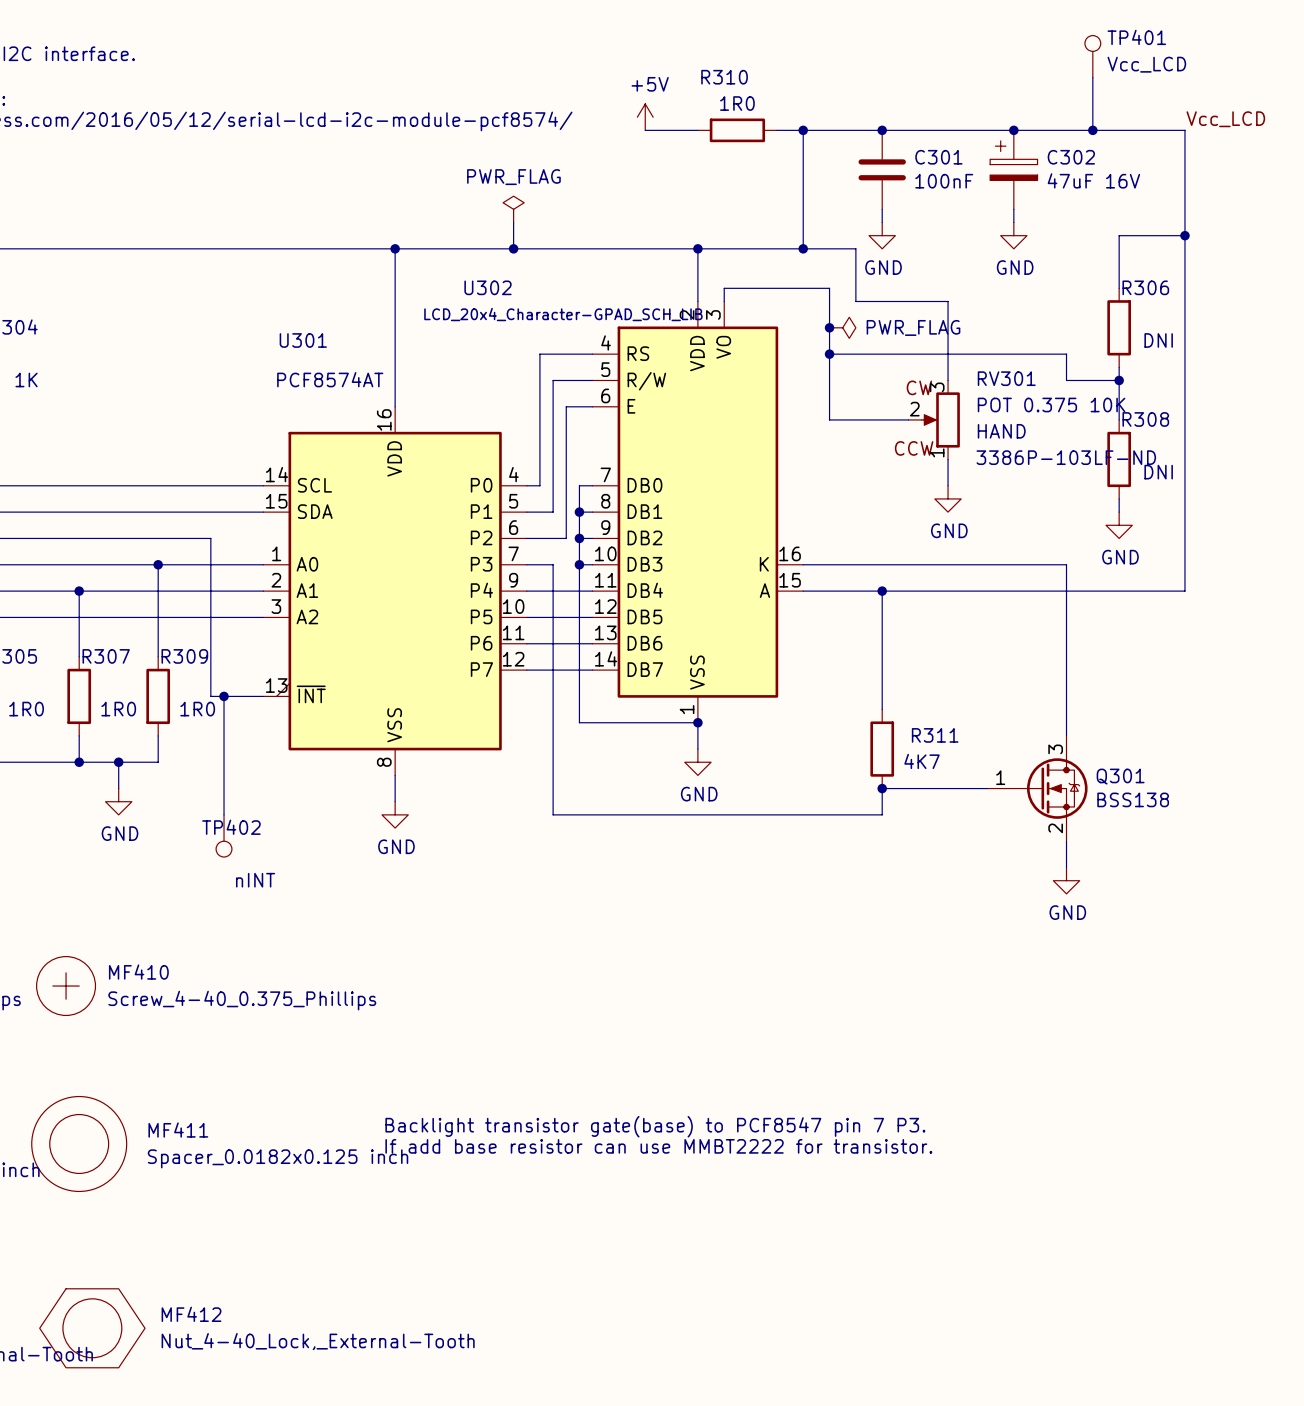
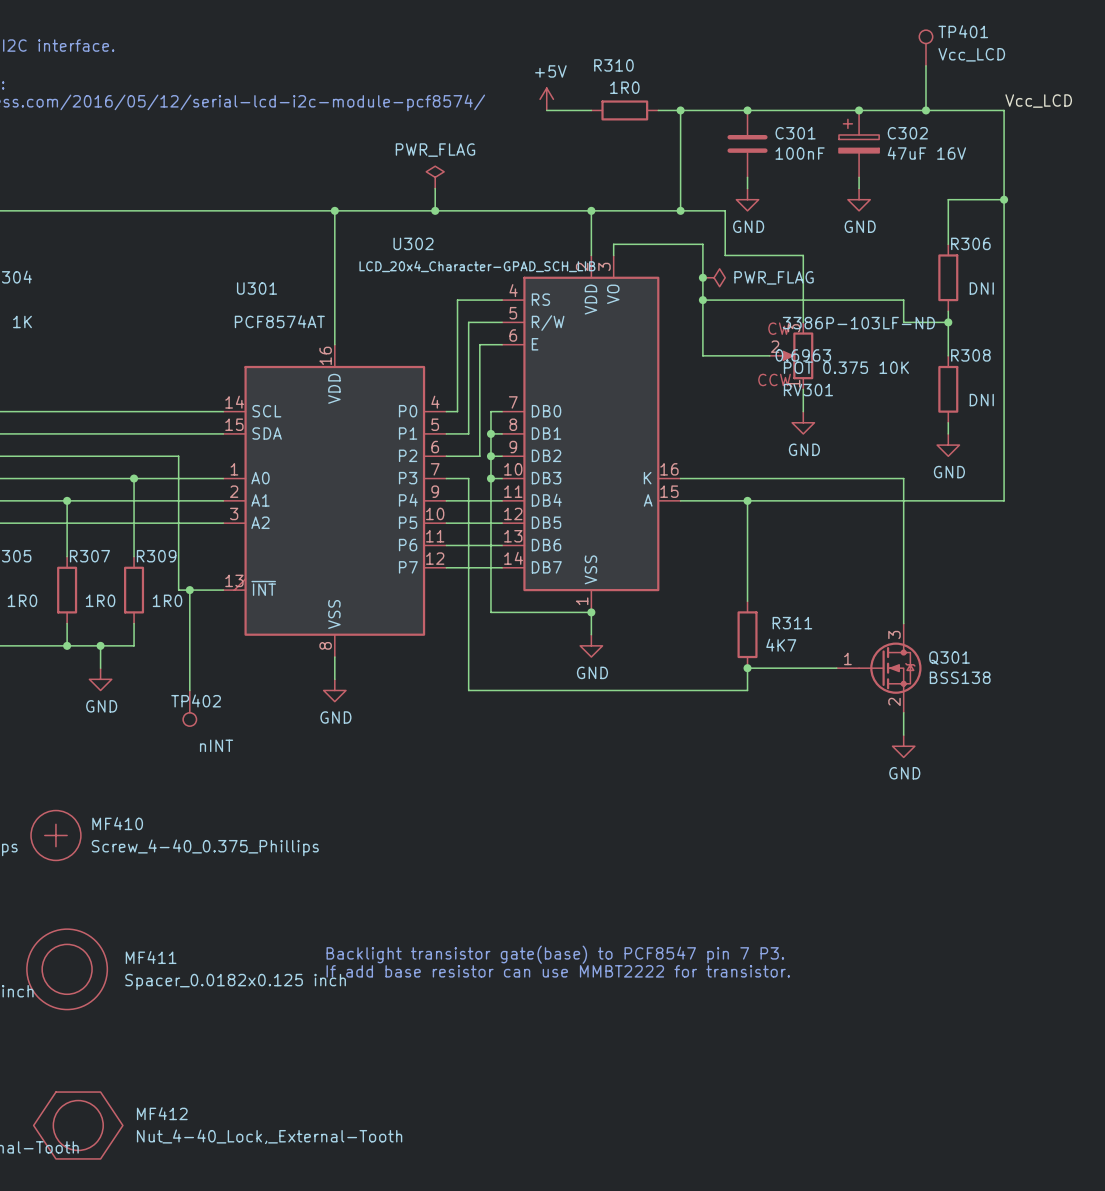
RV301 name position: RV301 (1006, 378) -> RV301 (808, 390)
RV301 value position: POT 0.375 10K (1051, 404) -> POT 0.375 10K (846, 367)
RV301 text: none -> 0.6963 (803, 355)
RV301 text: HAND (1001, 431) -> none
RV301 text position: 3386P-103LF-ND (1066, 457) -> 3386P-103LF-ND (858, 323)

